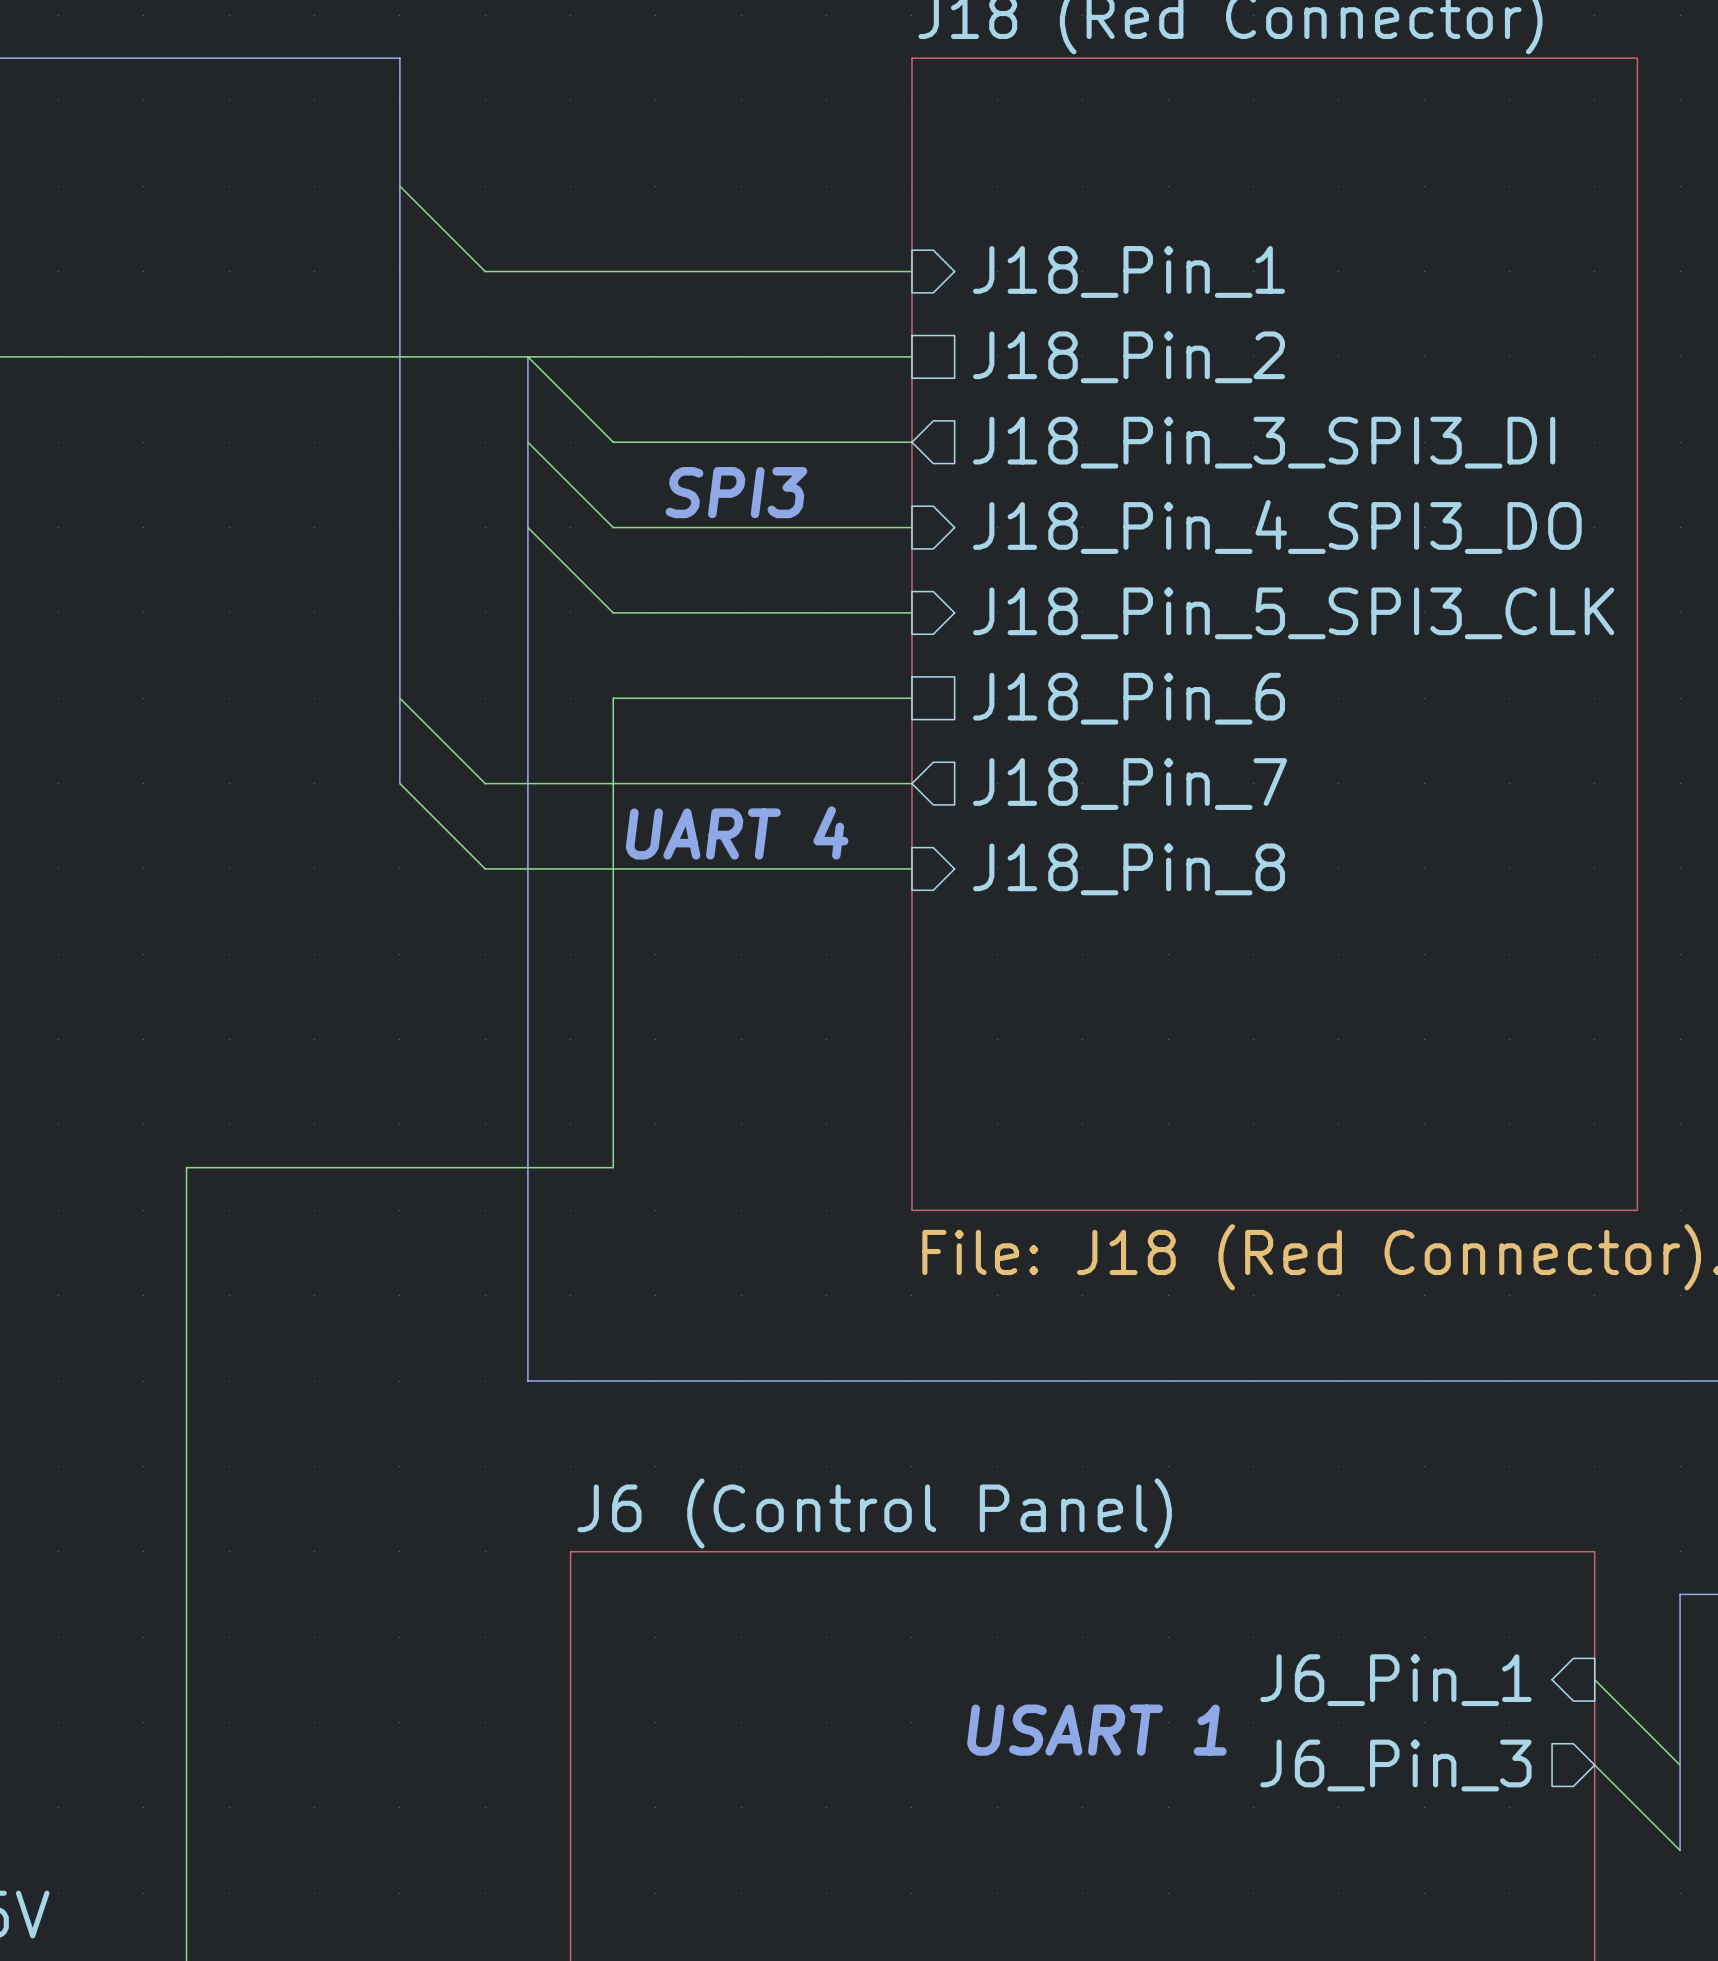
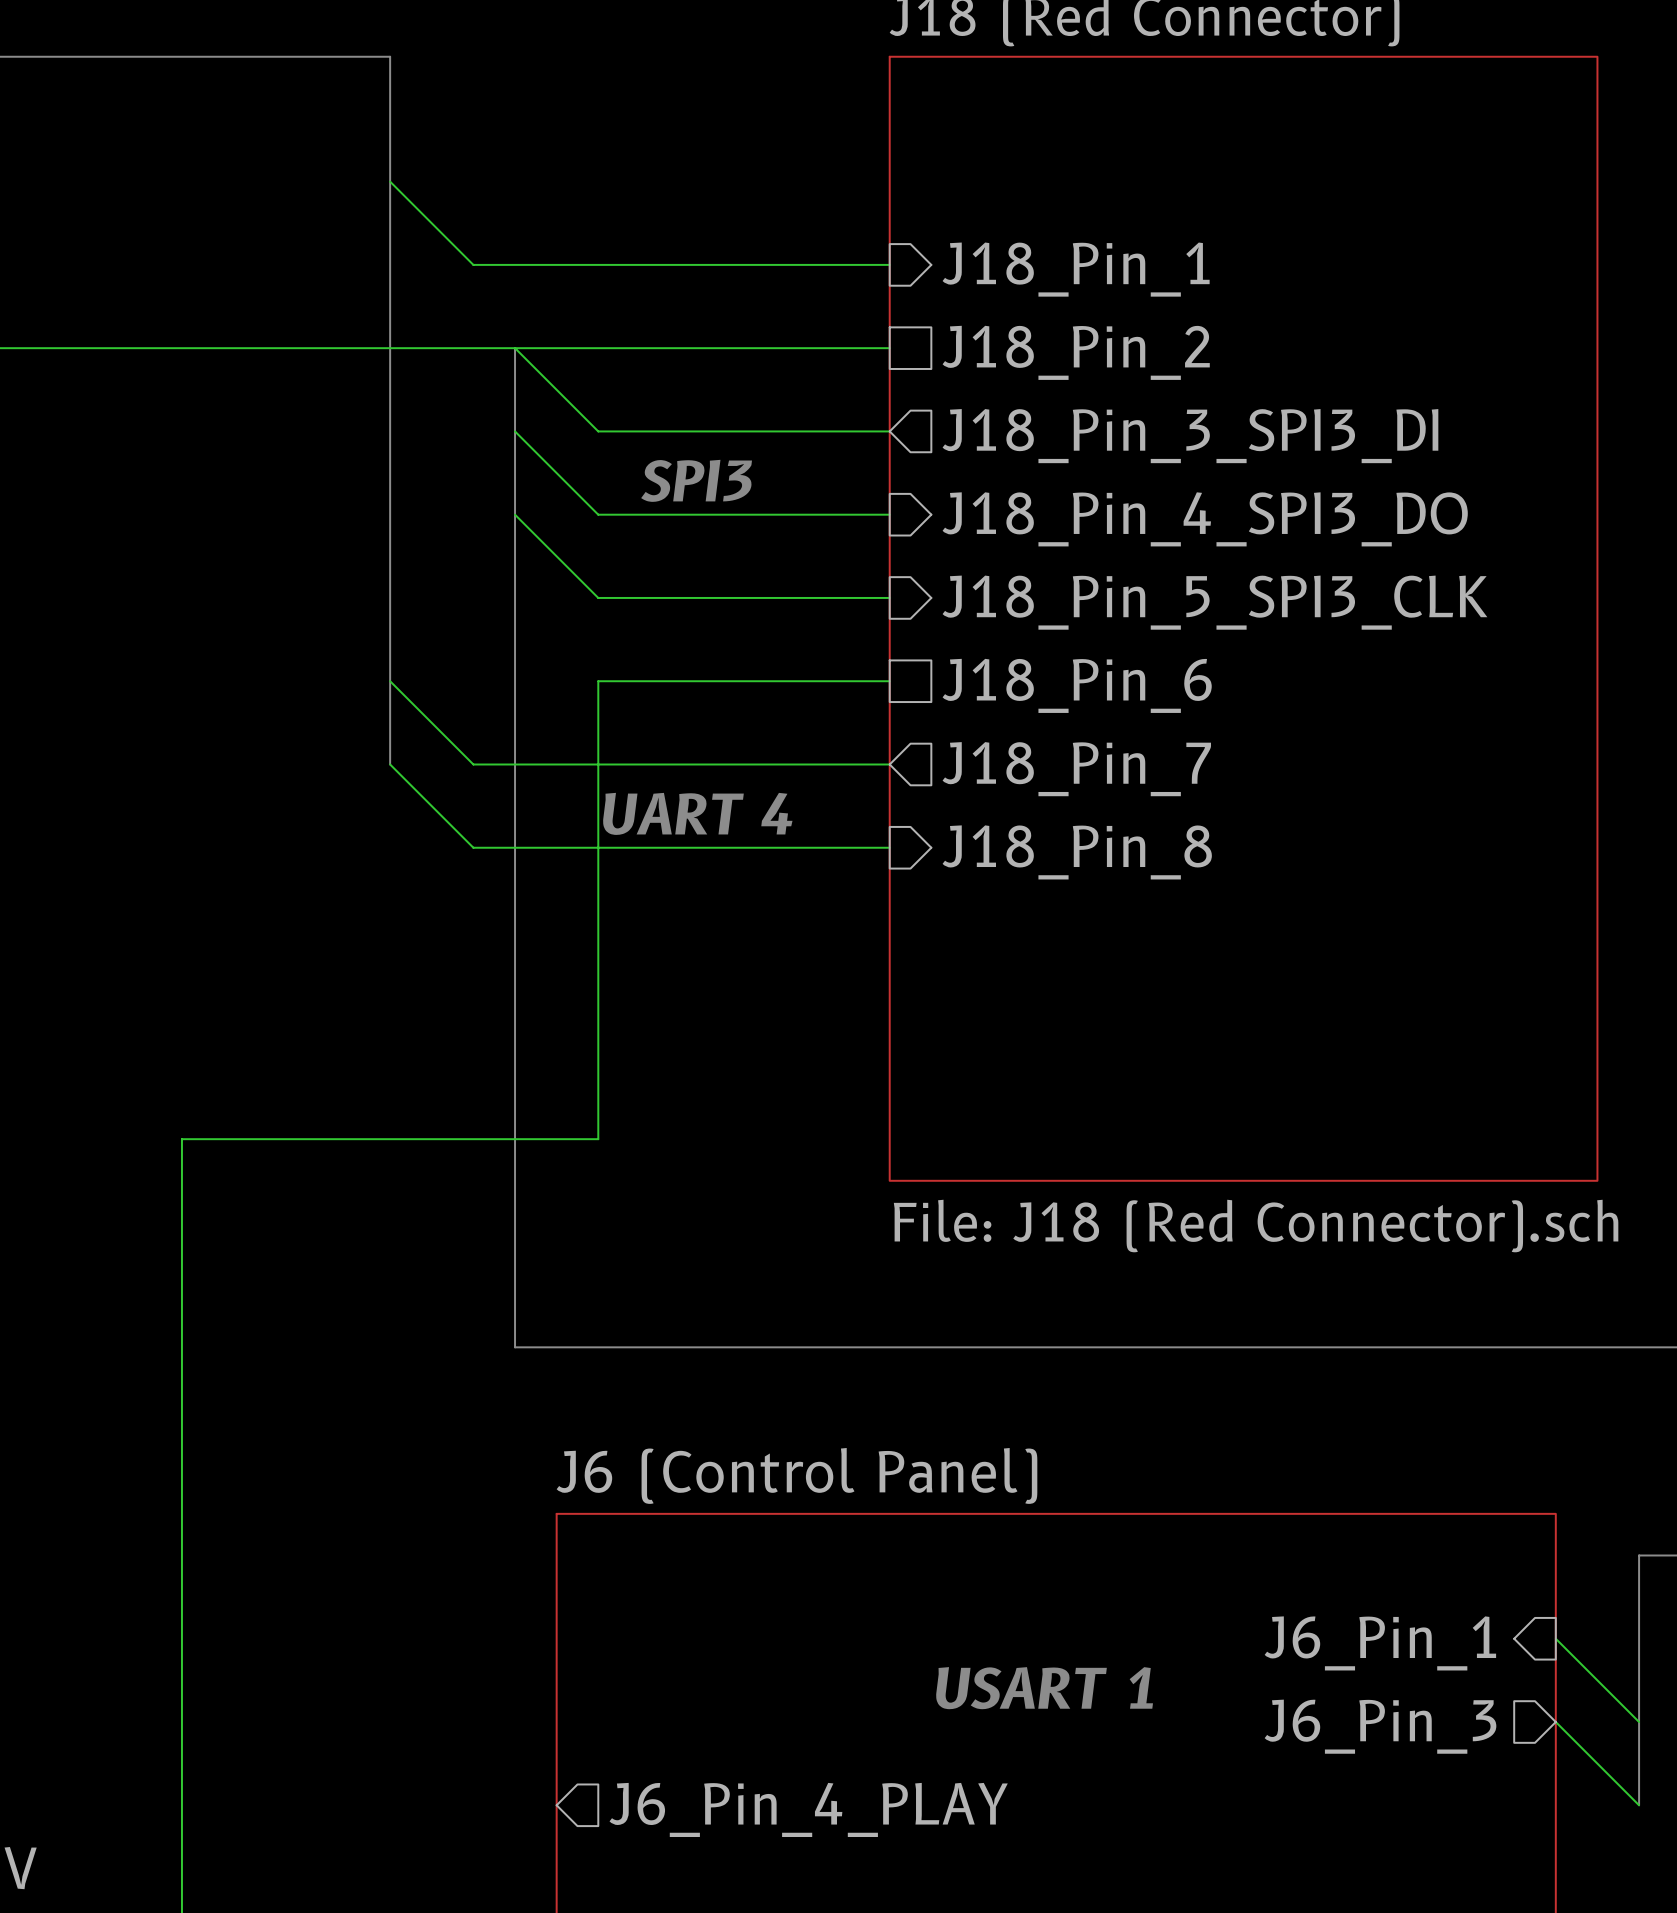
sheet pin: none -> J6_Pin_4_PLAY (808, 1809)

